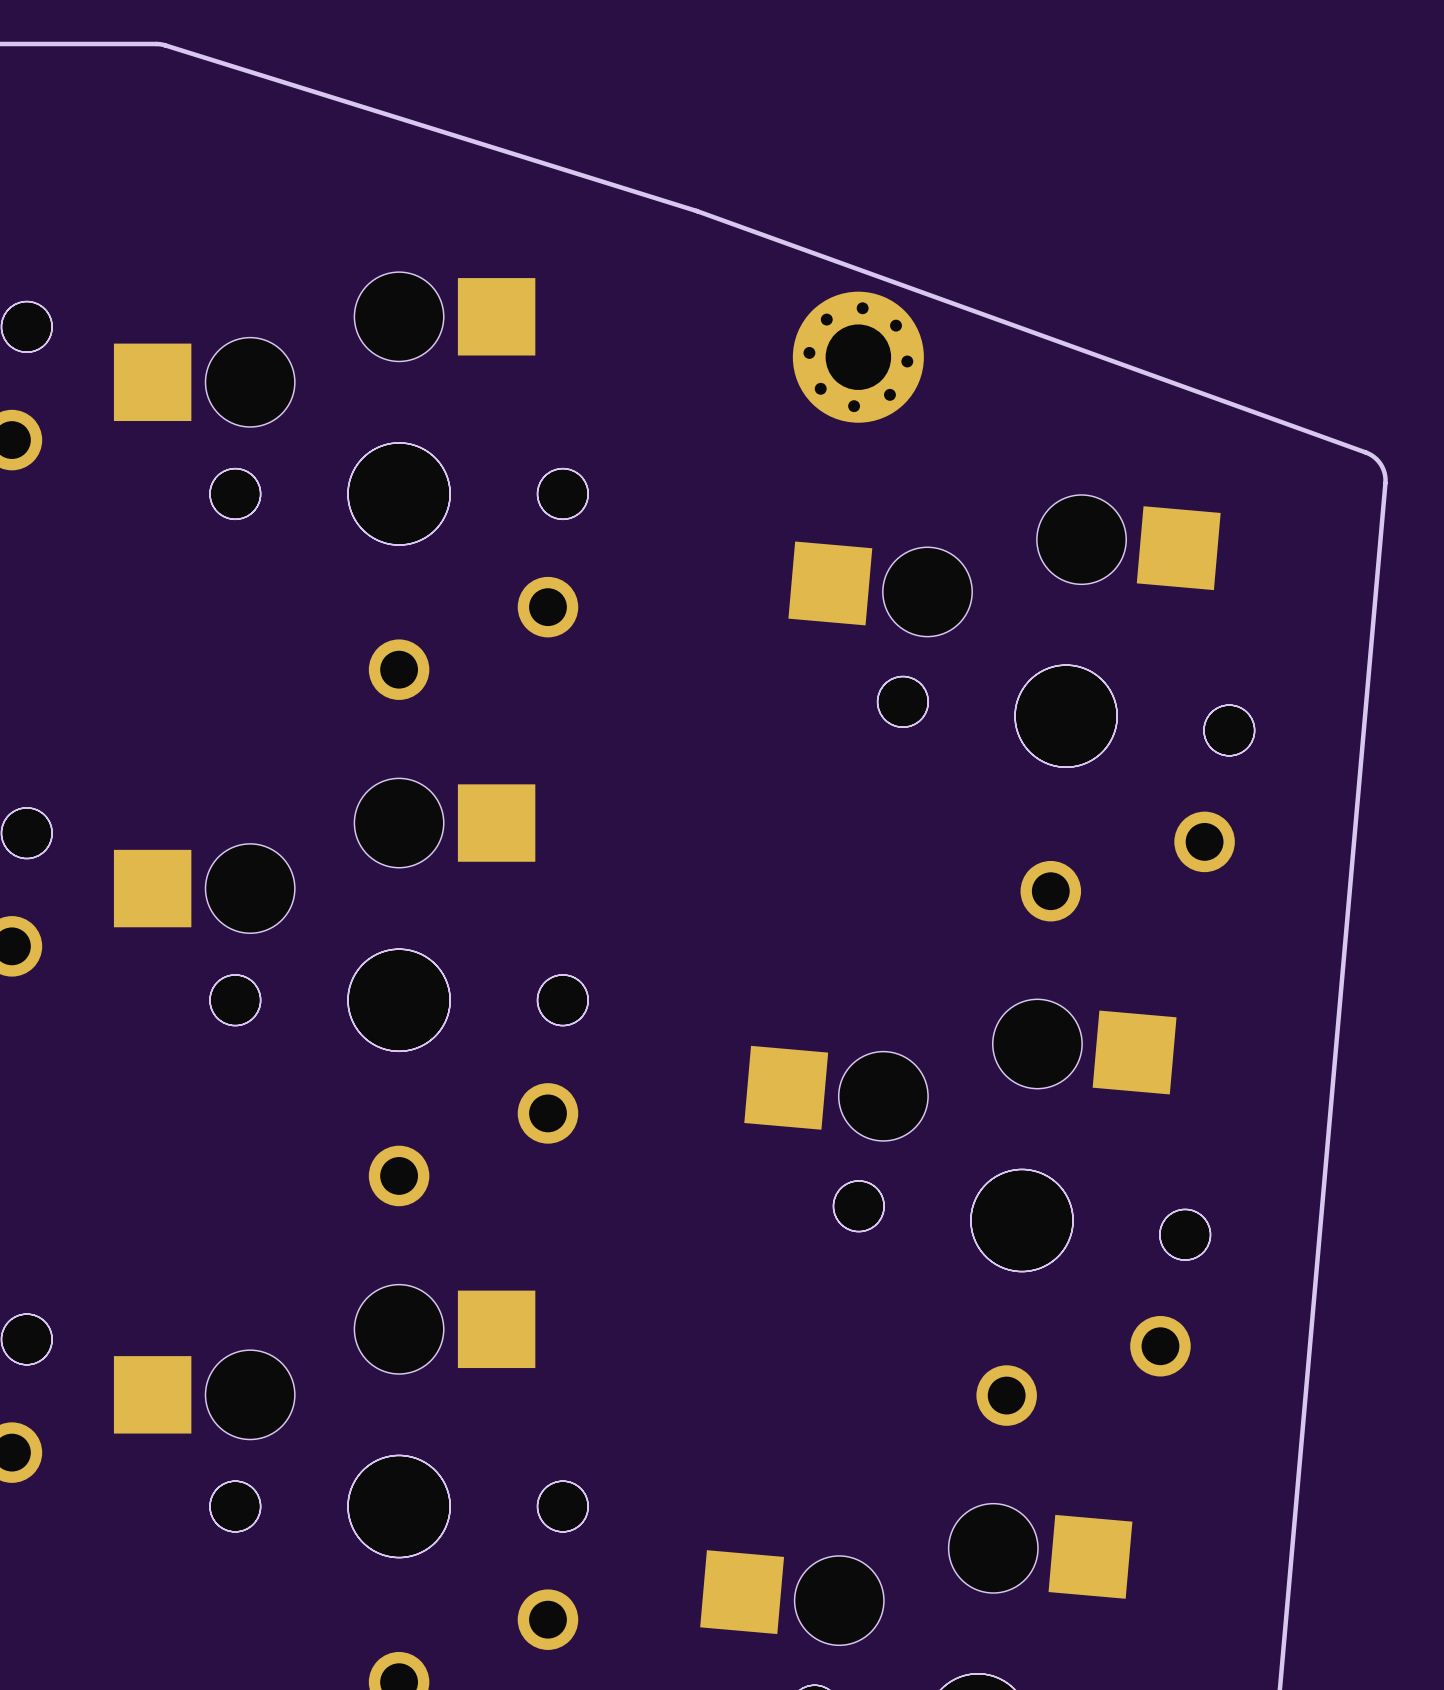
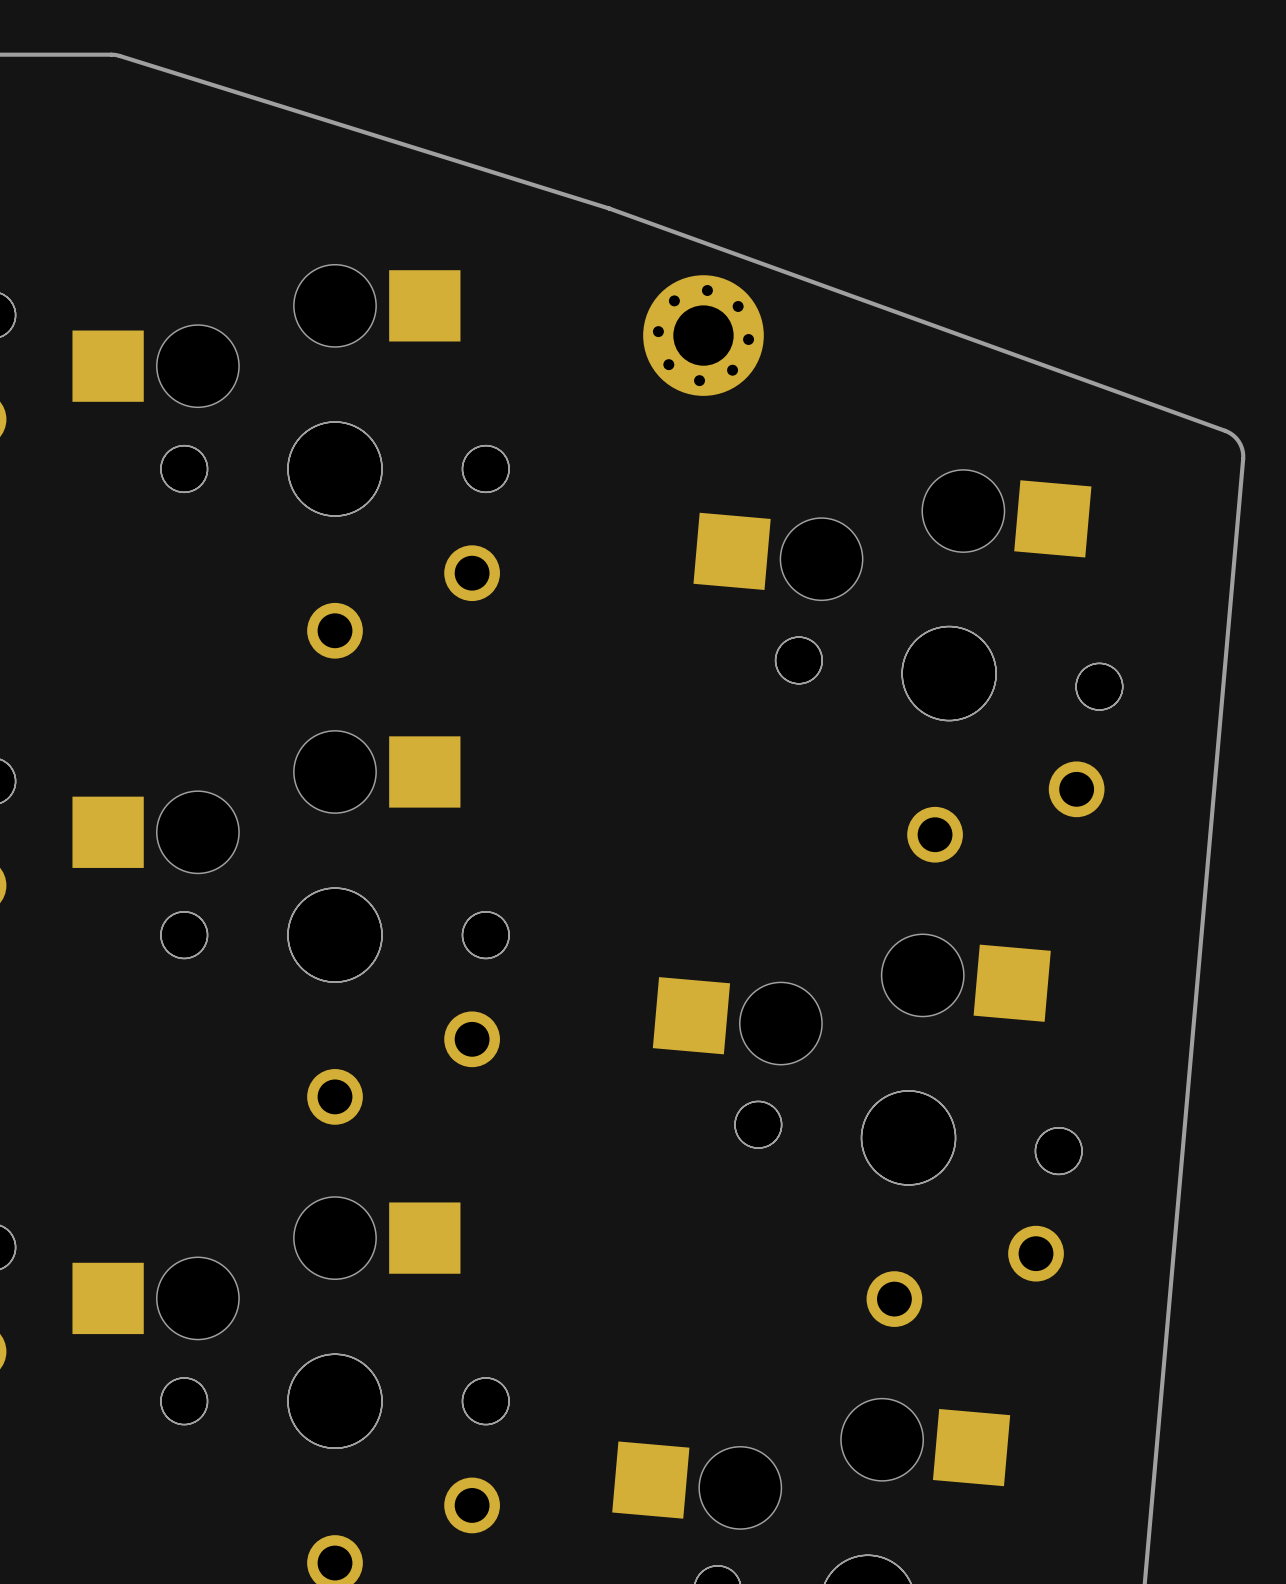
part position: (858, 357) -> (703, 335)

